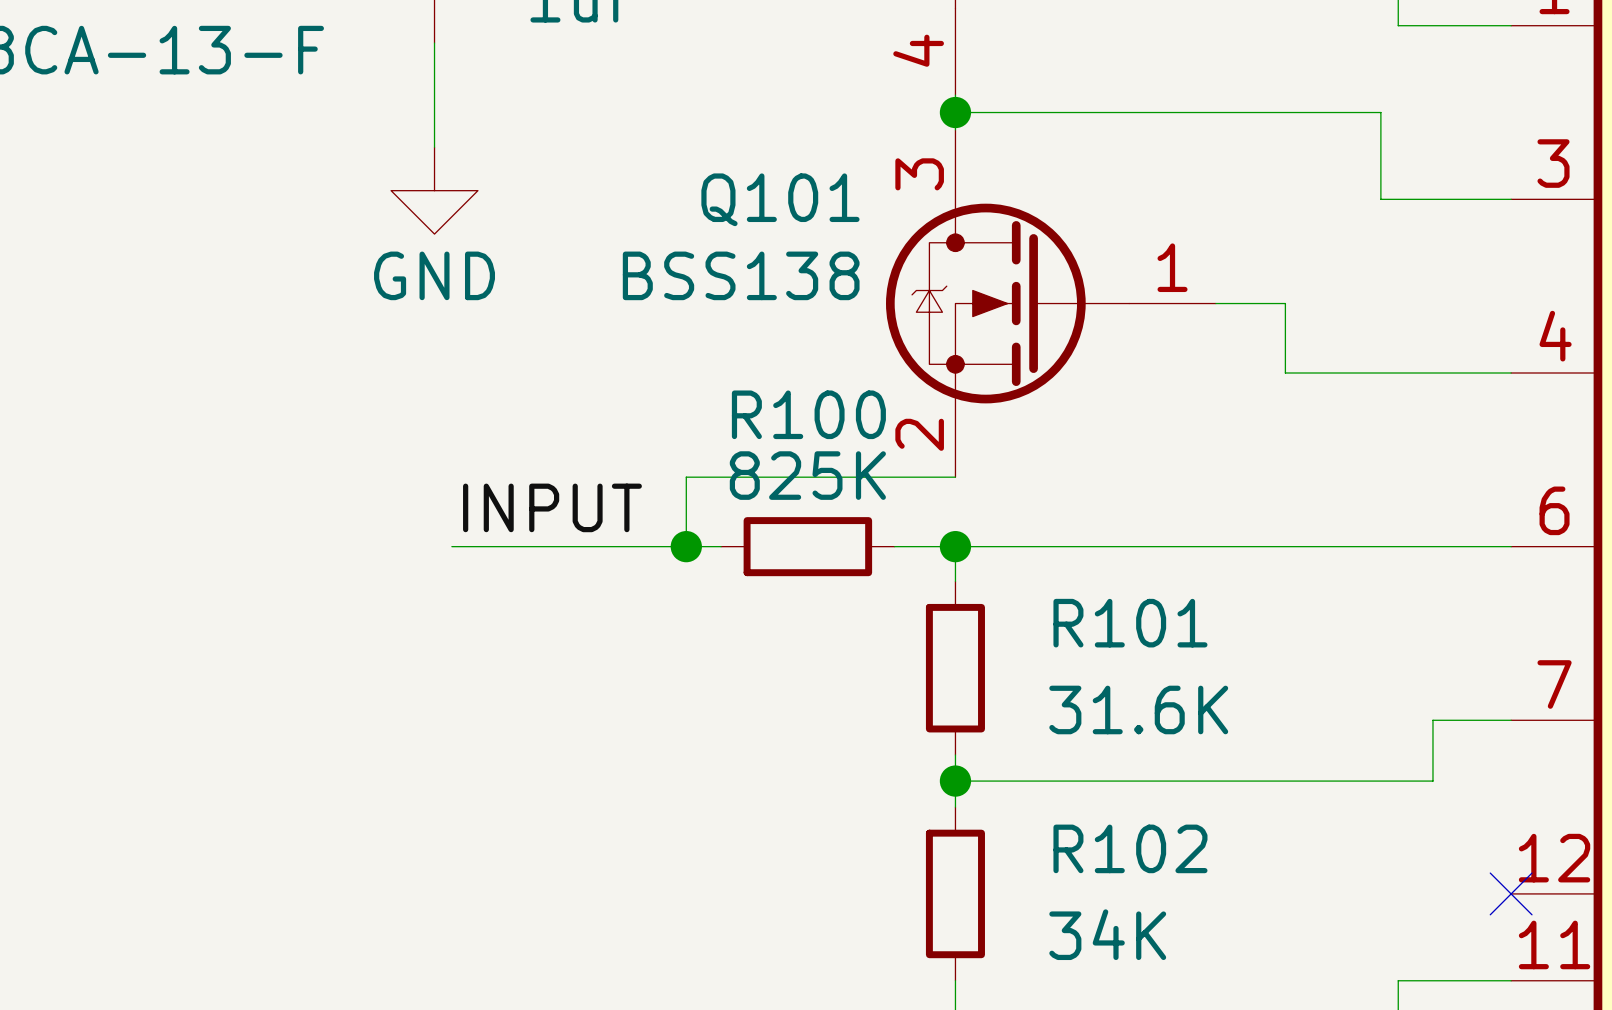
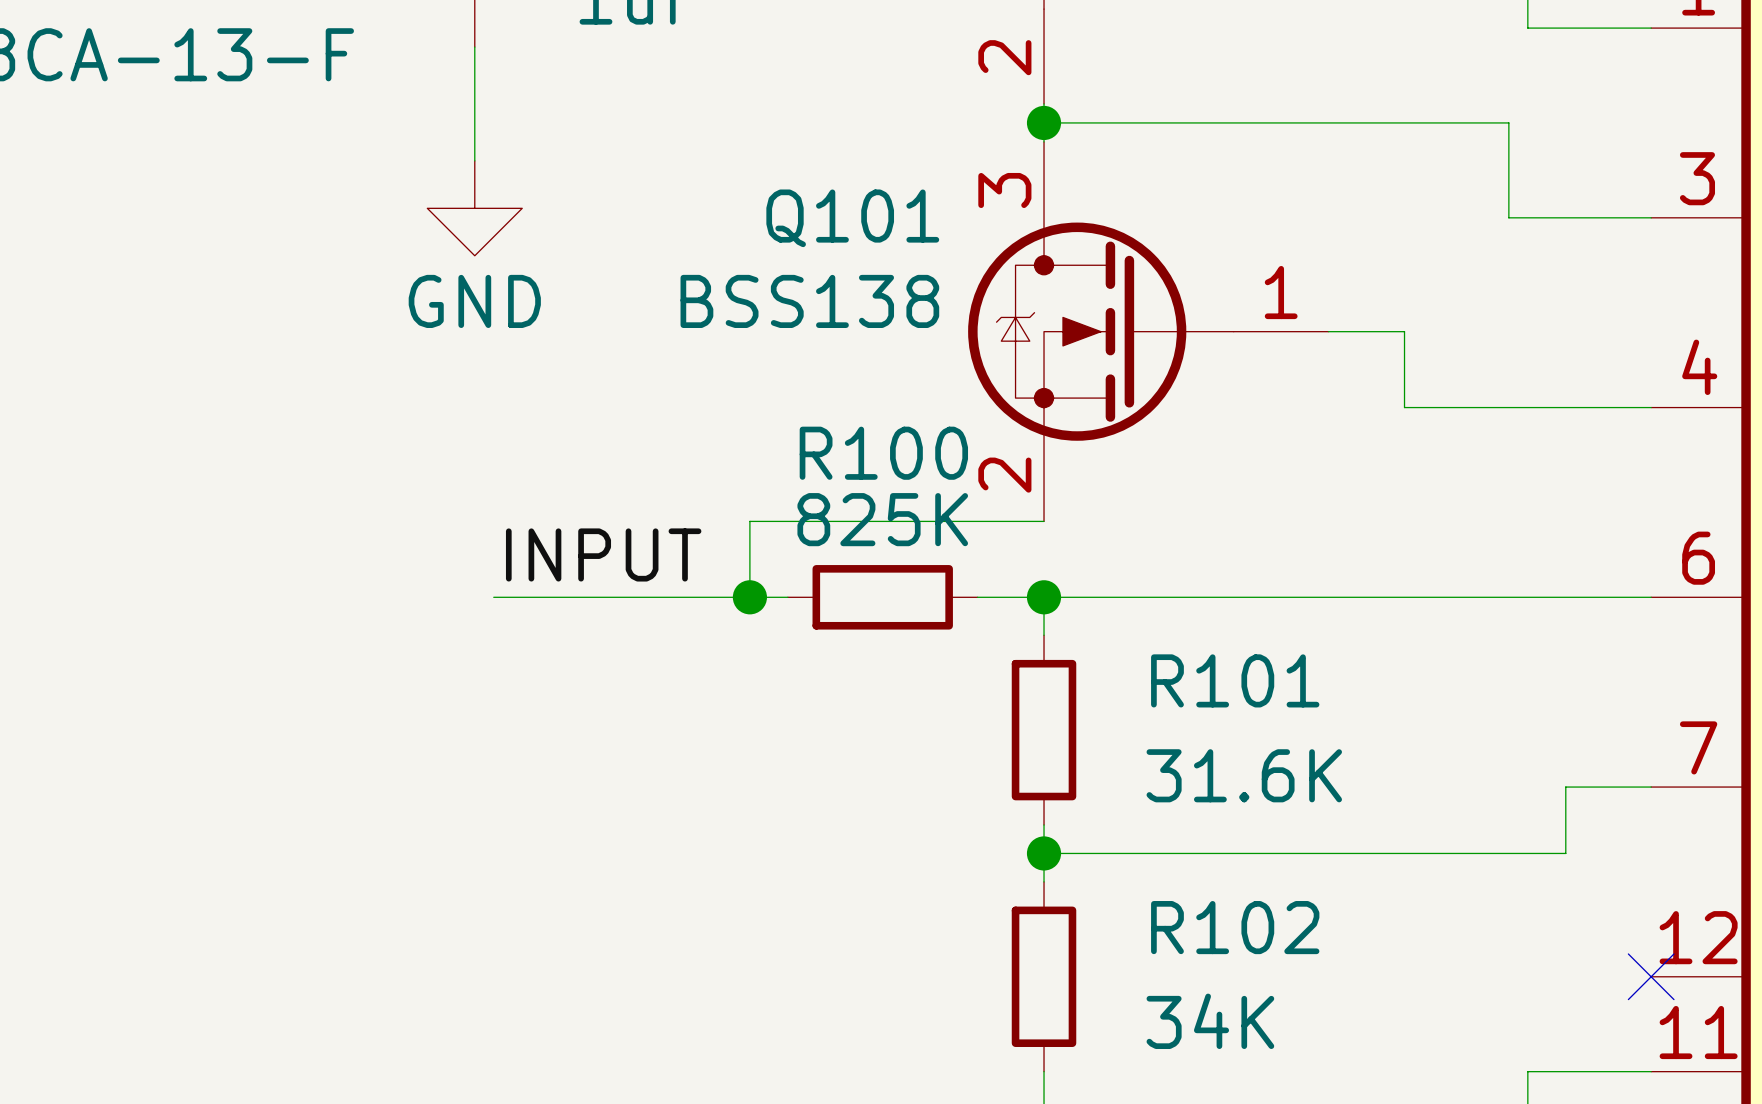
part pin number: 4 (918, 50) -> 2 (1004, 57)

